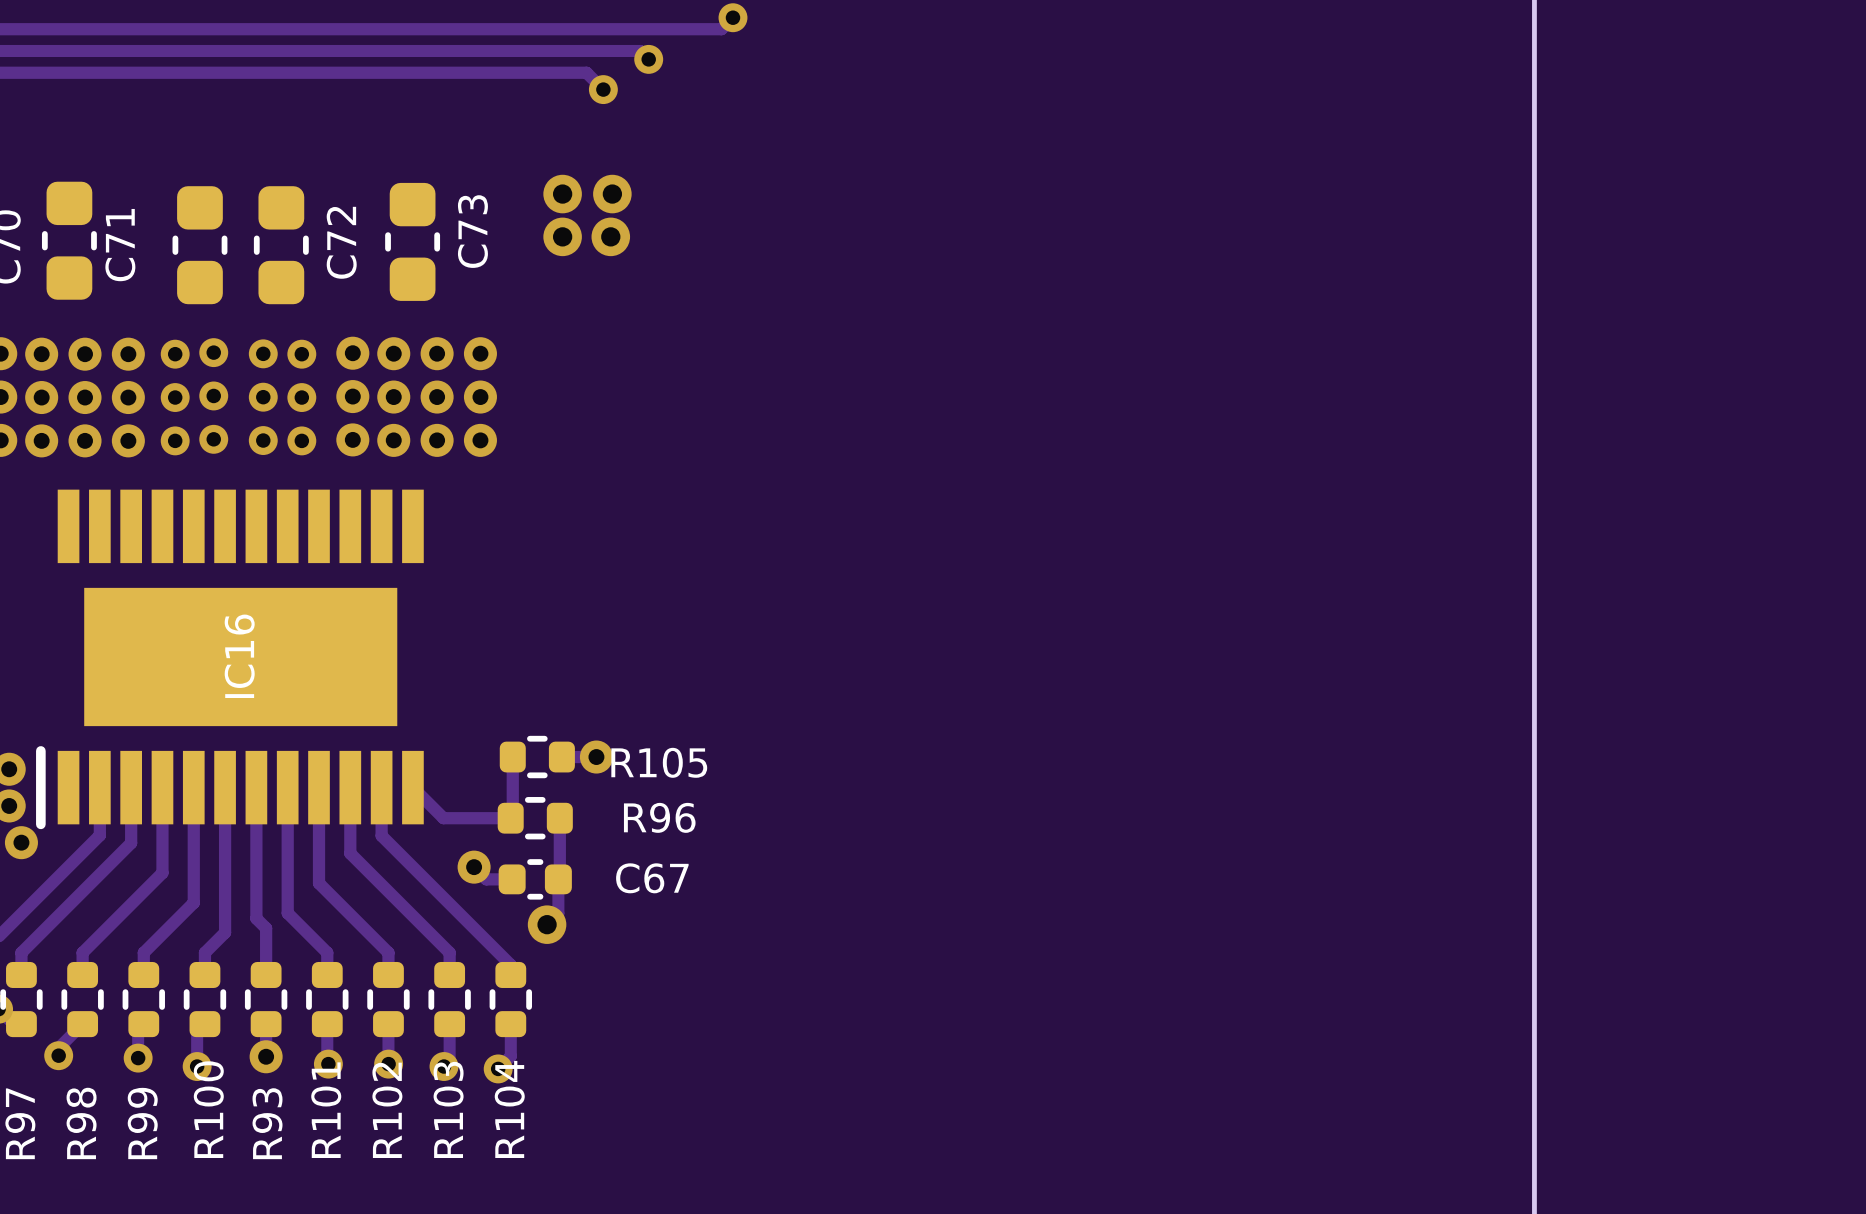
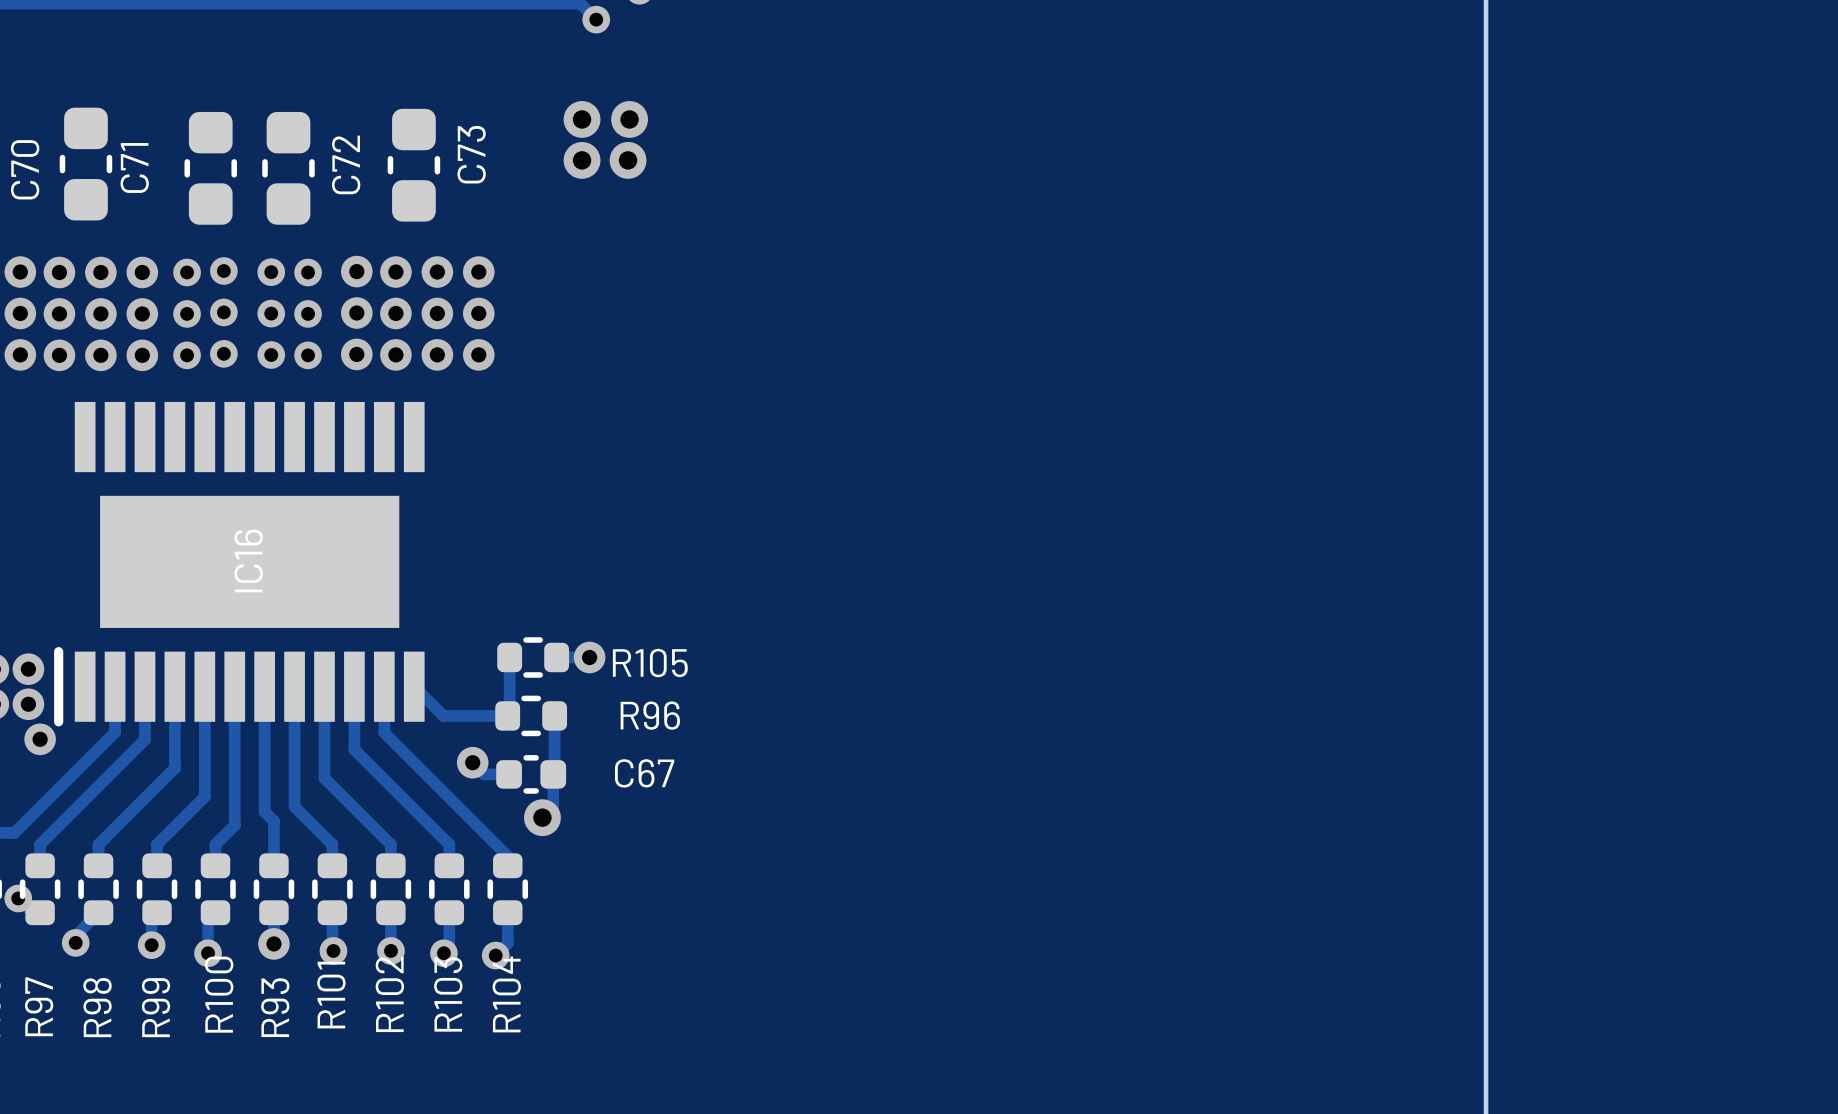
via: (562, 194) -> none
via: none -> (582, 119)
via: (612, 194) -> none
via: none -> (629, 119)
via: (562, 236) -> none
via: none -> (582, 160)
via: (610, 236) -> none
via: none -> (628, 160)

